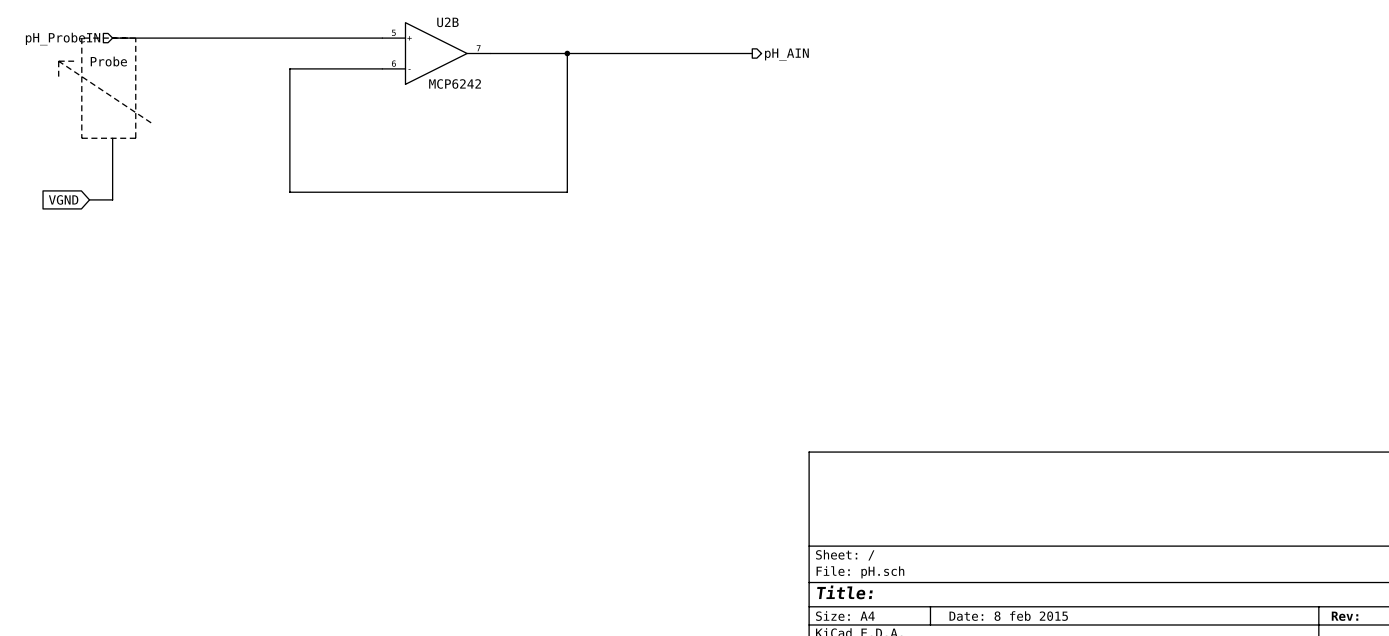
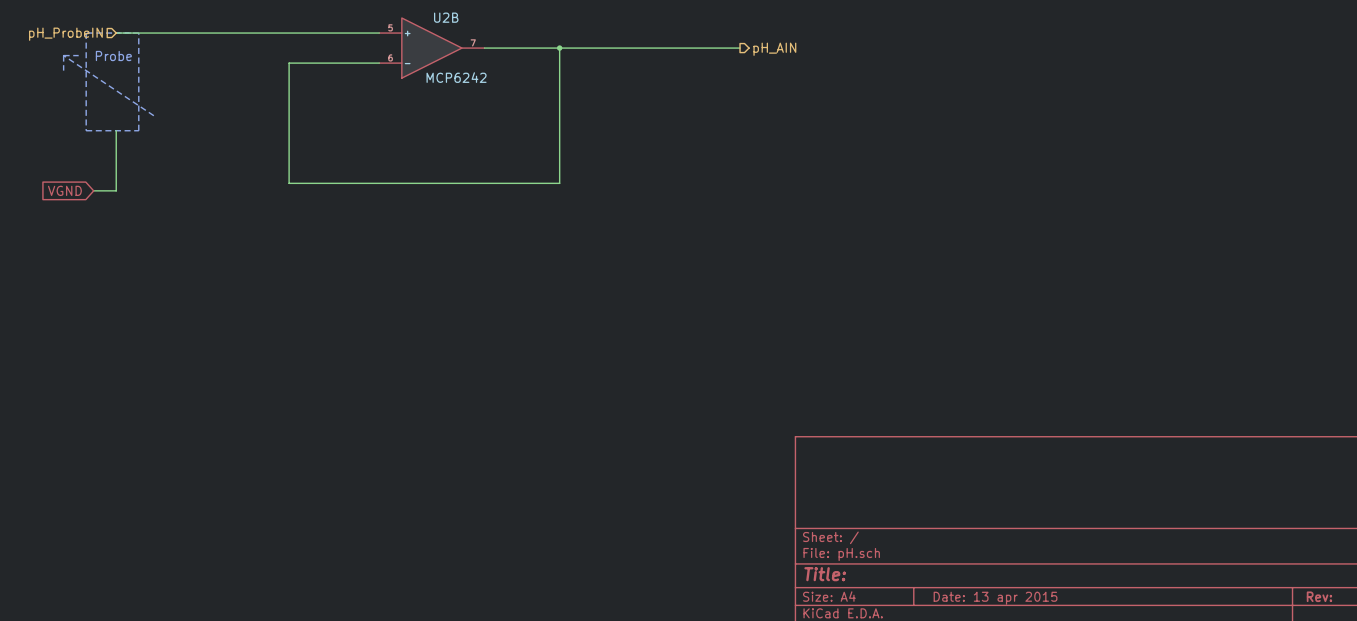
title block: Date: 8 feb 2015 (1008, 616) -> Date: 13 apr 2015 (995, 598)

